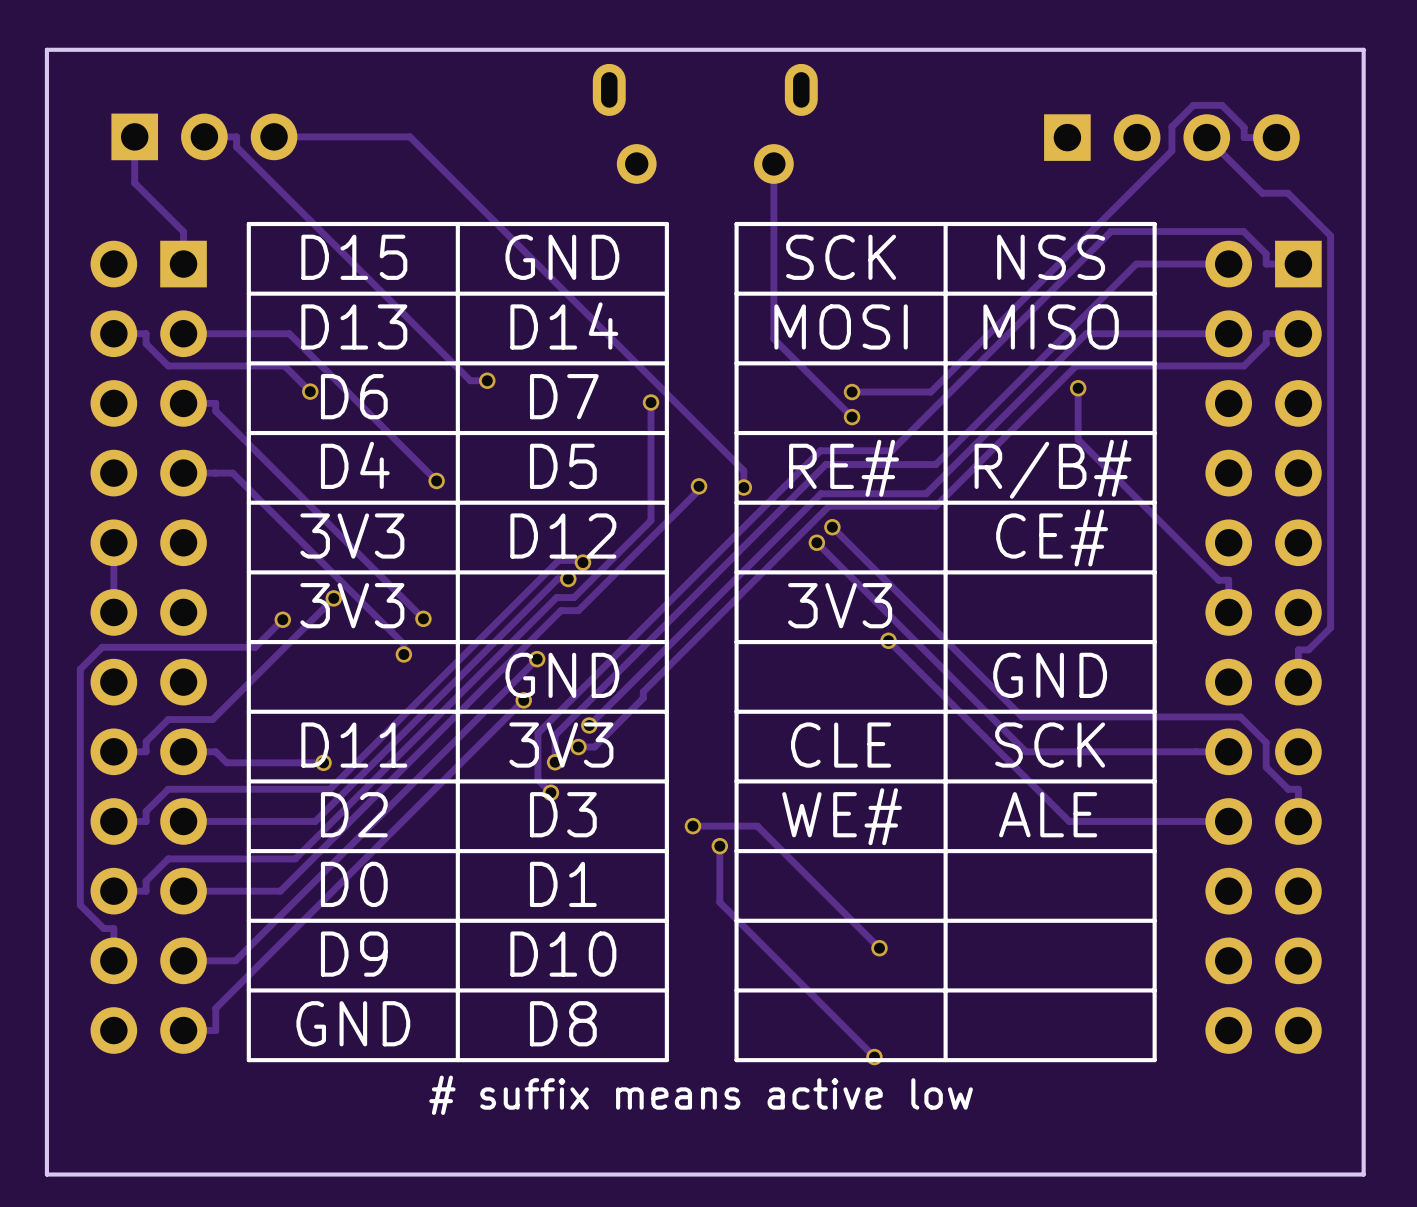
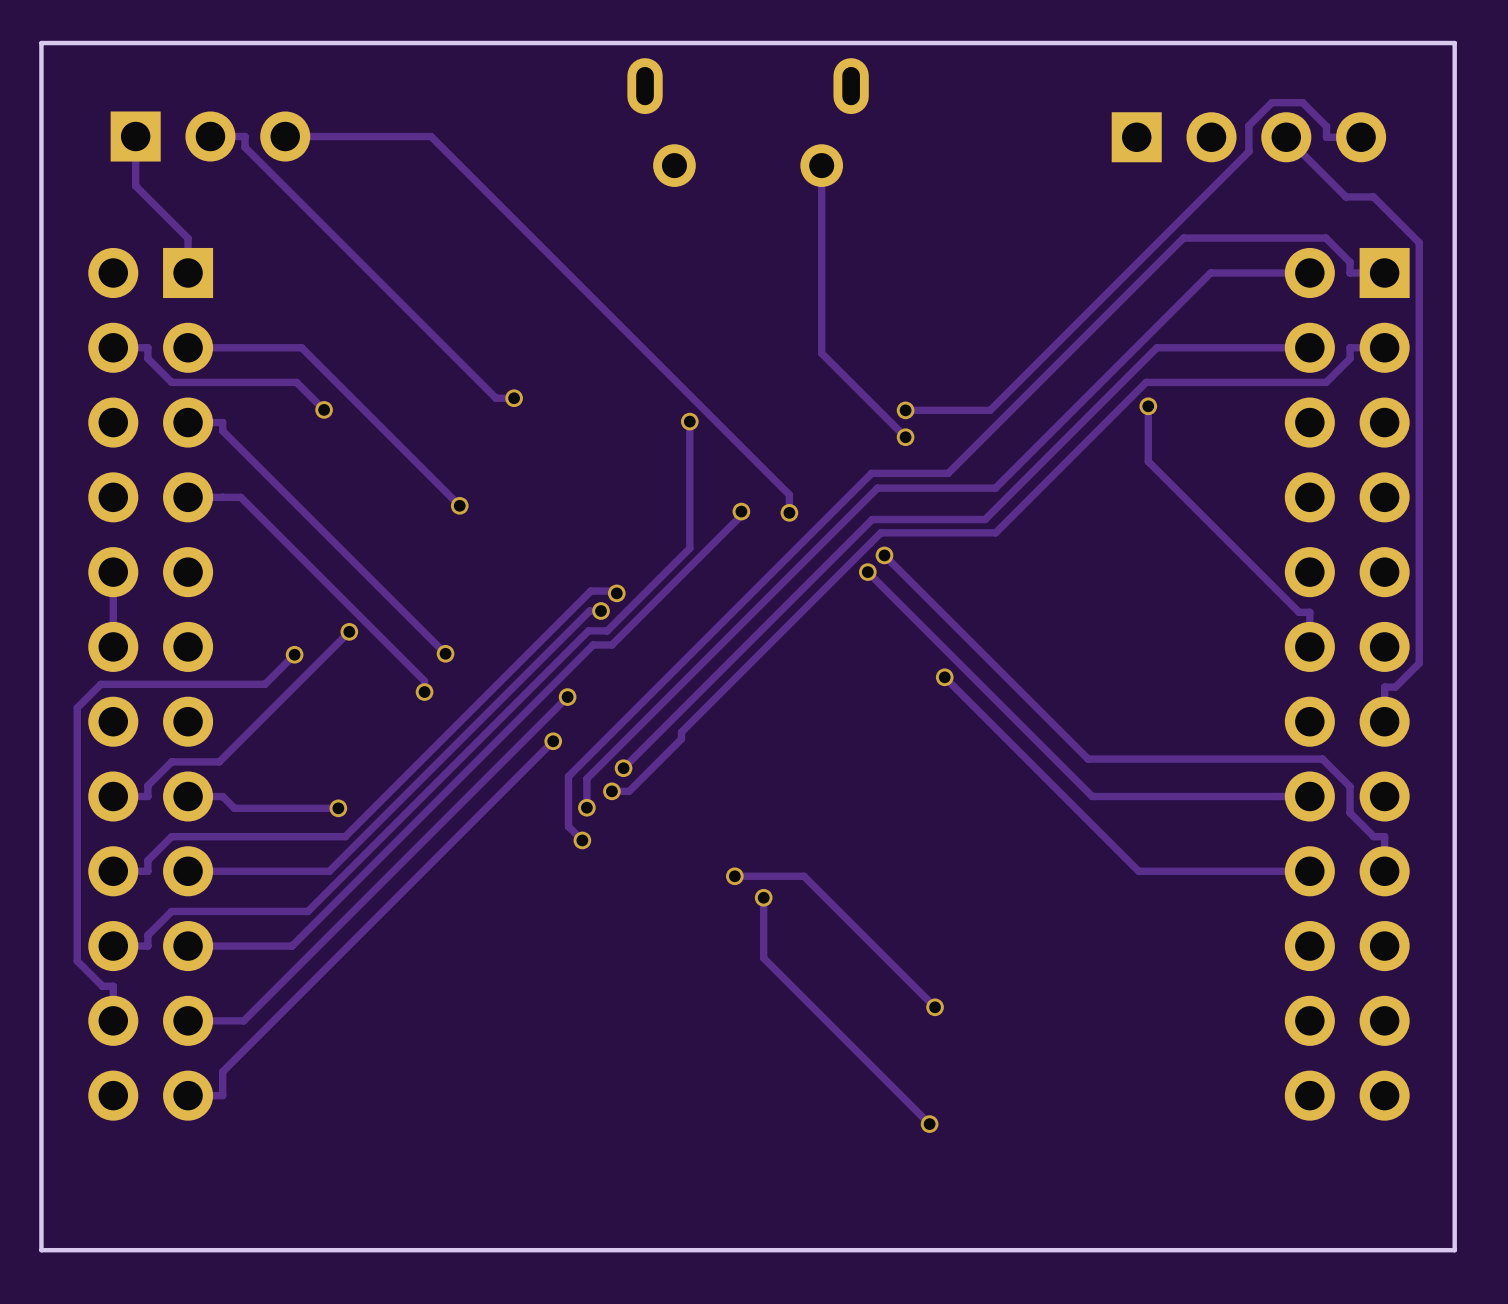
line: (457, 223) (457, 1060) -> none
line: (666, 223) (248, 223) (248, 1060) (666, 1060) (666, 223) -> none
line: (945, 223) (945, 1060) -> none
line: (1154, 223) (736, 223) (736, 1060) (1154, 1060) (1154, 223) -> none
text: D15 (354, 257) -> none
text: GND (562, 257) -> none
text: SCK (841, 257) -> none
text: NSS (1051, 257) -> none
line: (666, 293) (248, 293) -> none
line: (1154, 293) (736, 293) -> none
text: D14 (564, 325) -> none
text: D13 (354, 326) -> none
text: MOSI (841, 326) -> none
text: MISO (1051, 326) -> none
line: (666, 363) (248, 363) -> none
line: (1154, 363) (736, 363) -> none
text: D6 (354, 396) -> none
text: D7 (564, 396) -> none
line: (666, 433) (248, 433) -> none
line: (1154, 433) (736, 433) -> none
text: D4 (355, 465) -> none
text: D5 (563, 466) -> none
text: RE# (844, 468) -> none
text: R/B# (1053, 469) -> none
line: (666, 502) (248, 502) -> none
line: (1154, 502) (736, 502) -> none
text: 3V3 (352, 536) -> none
text: D12 (563, 536) -> none
text: CE# (1052, 537) -> none
line: (666, 572) (248, 572) -> none
line: (1154, 572) (736, 572) -> none
text: 3V3 (352, 605) -> none
text: 3V3 (840, 605) -> none
line: (666, 642) (248, 642) -> none
line: (1154, 642) (736, 642) -> none
text: GND (562, 675) -> none
text: GND (1050, 675) -> none
line: (666, 711) (248, 711) -> none
line: (1154, 711) (736, 711) -> none
text: D11 (354, 745) -> none
text: 3V3 (561, 745) -> none
text: CLE (841, 745) -> none
text: SCK (1050, 745) -> none
line: (666, 781) (248, 781) -> none
line: (1154, 781) (736, 781) -> none
text: D2 (354, 814) -> none
text: D3 (563, 814) -> none
text: ALE (1048, 814) -> none
text: WE# (842, 816) -> none
line: (666, 851) (248, 851) -> none
line: (1154, 851) (736, 851) -> none
text: D0 (354, 884) -> none
text: D1 (563, 884) -> none
line: (666, 920) (248, 920) -> none
line: (1154, 920) (736, 920) -> none
text: D9 (354, 954) -> none
text: D10 (563, 954) -> none
line: (666, 990) (248, 990) -> none
line: (1154, 990) (736, 990) -> none
text: GND (353, 1023) -> none
text: D8 (563, 1023) -> none
text: # suffix means active low (701, 1095) -> none

